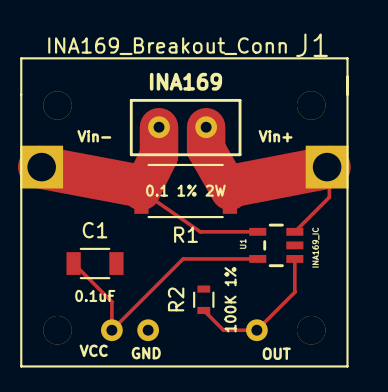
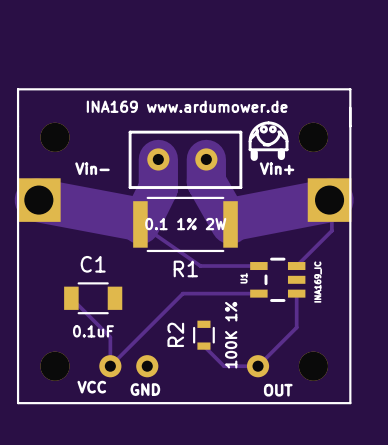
J1 name: J1 (312, 45) -> none
J1 value: INA169_Breakout_Conn (167, 46) -> INA169 www.ardumower.de (187, 106)
text: INA169 (185, 81) -> none
line: none -> (268, 122) (259, 125) (253, 130) (250, 138) (250, 149) (287, 149) (286, 138) (283, 130) (277, 125) (268, 122)
drawing: none -> [259, 125, 277, 134]
line: none -> (257, 129) (259, 139) (269, 145)
line: none -> (257, 131) (250, 138)
line: none -> (278, 131) (285, 138)
line: none -> (280, 131) (274, 141) (264, 144)
line: none -> (281, 151) (281, 156)
line: none -> (254, 152) (254, 157)

